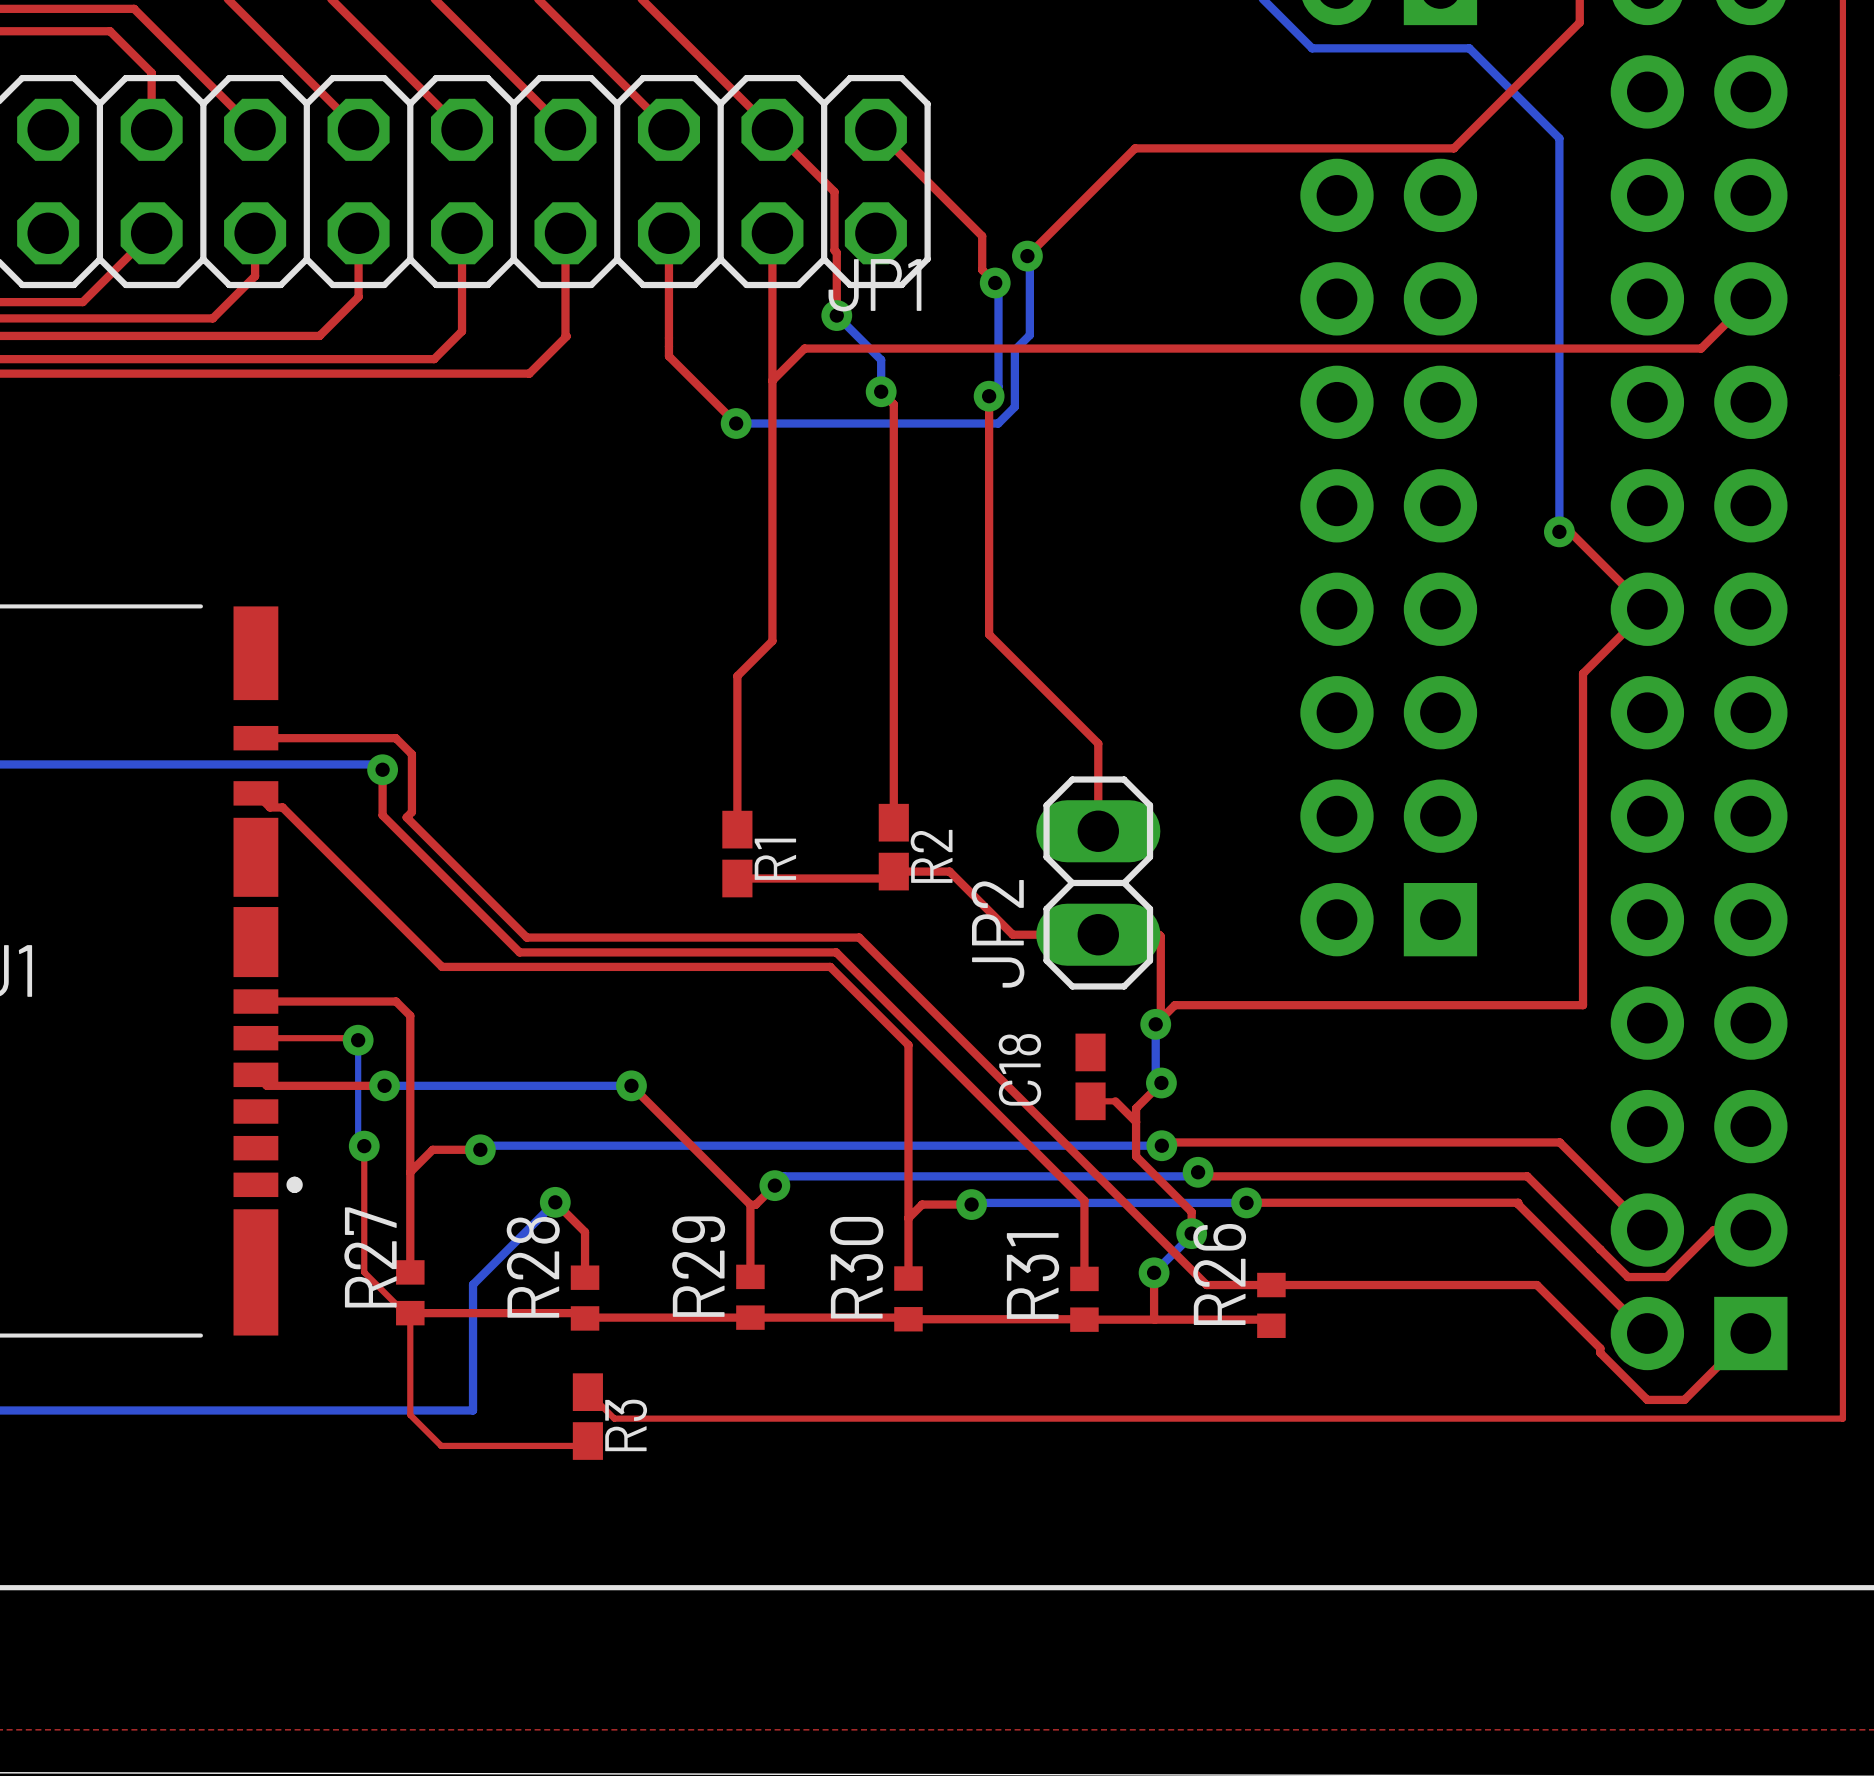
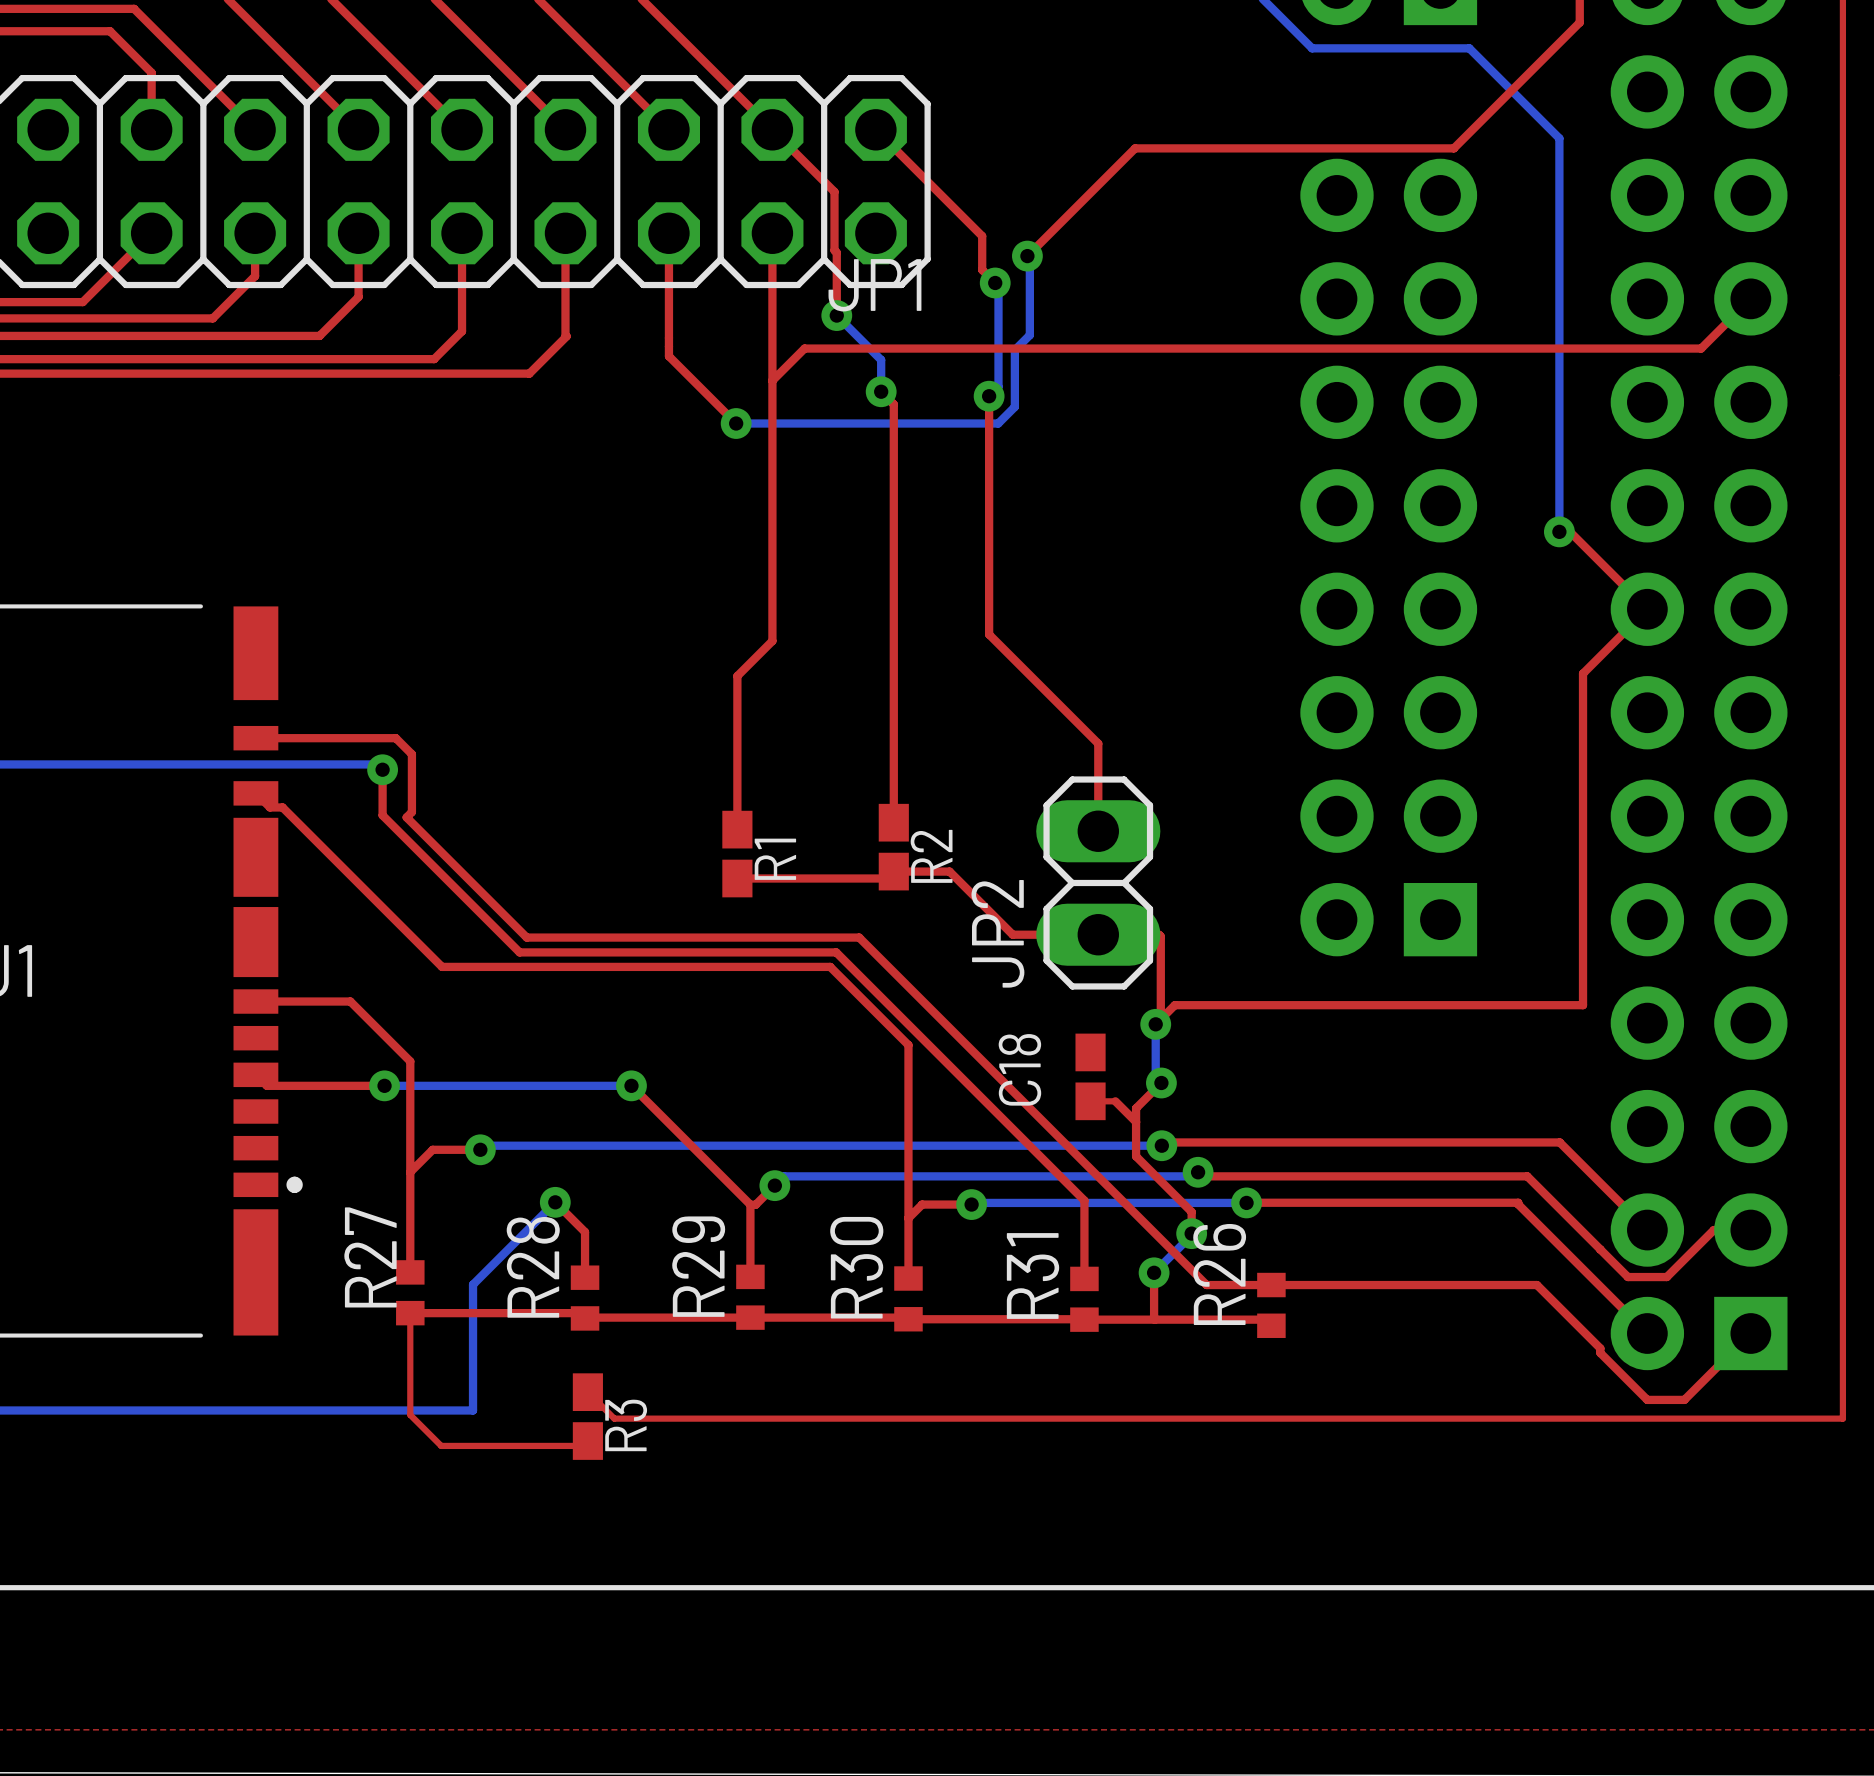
top track: (350, 1001) (396, 1001) (410, 1015) (410, 1061) -> (350, 1001) (410, 1061)
top track: (255, 1038) (356, 1038) (358, 1040) -> none
bottom track: (358, 1040) (358, 1140) (364, 1146) -> none
via: (358, 1040) -> none
top track: (364, 1146) (364, 1272) (410, 1318) -> none
via: (364, 1146) -> none

